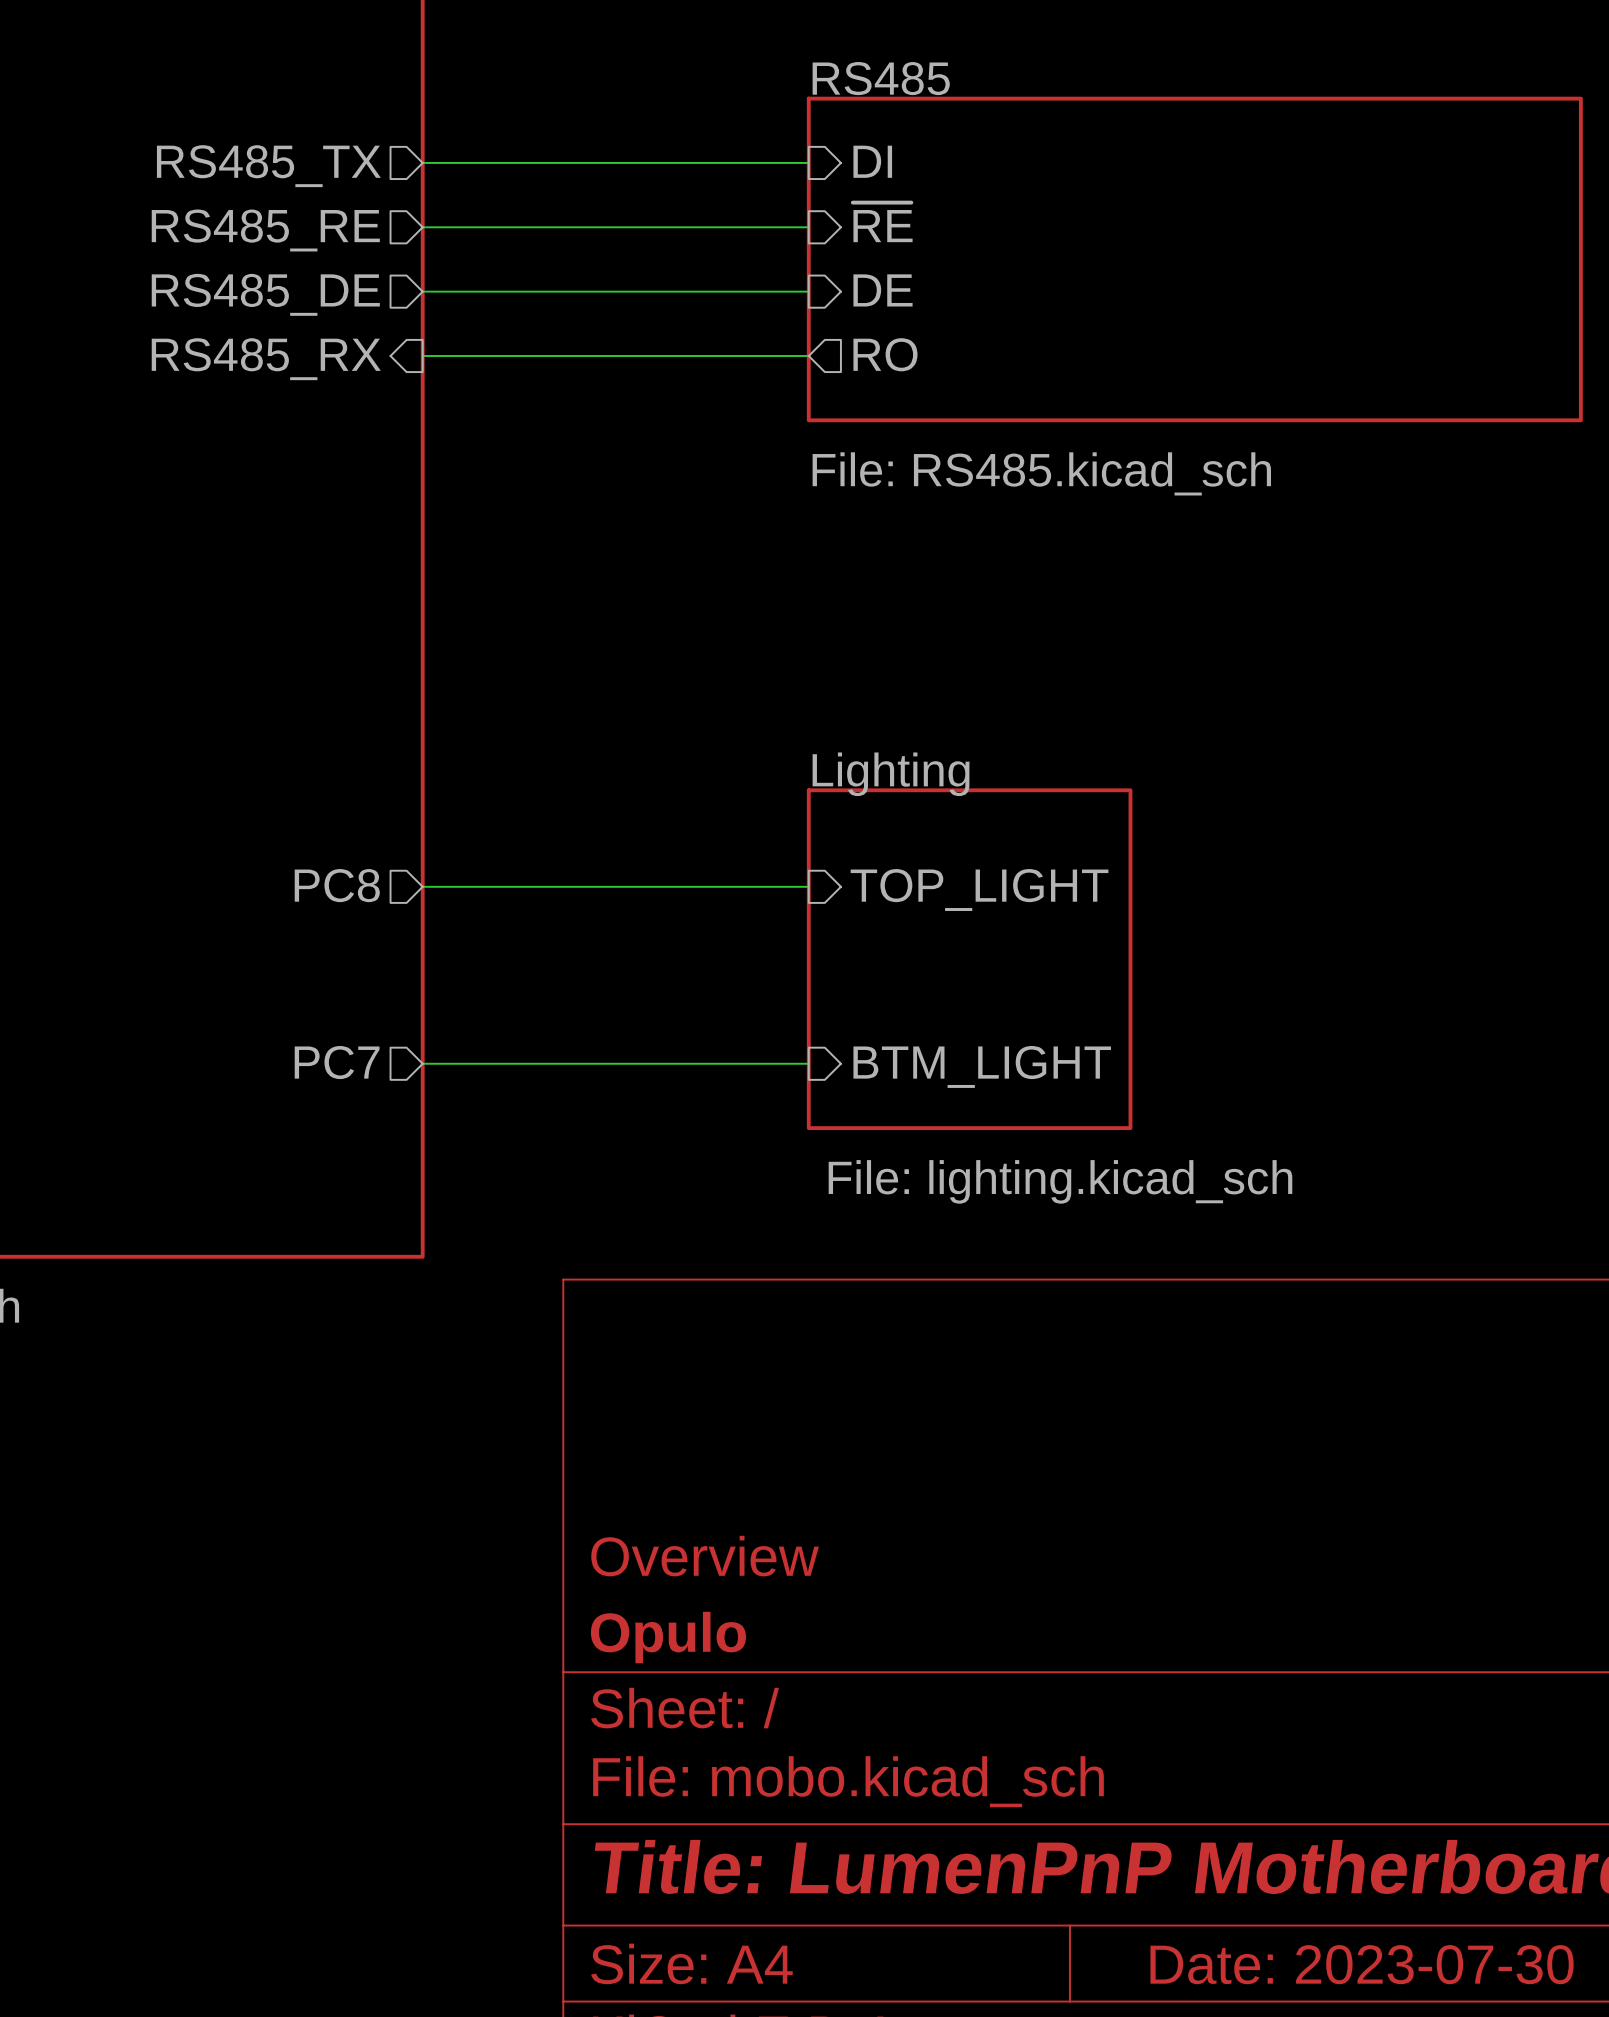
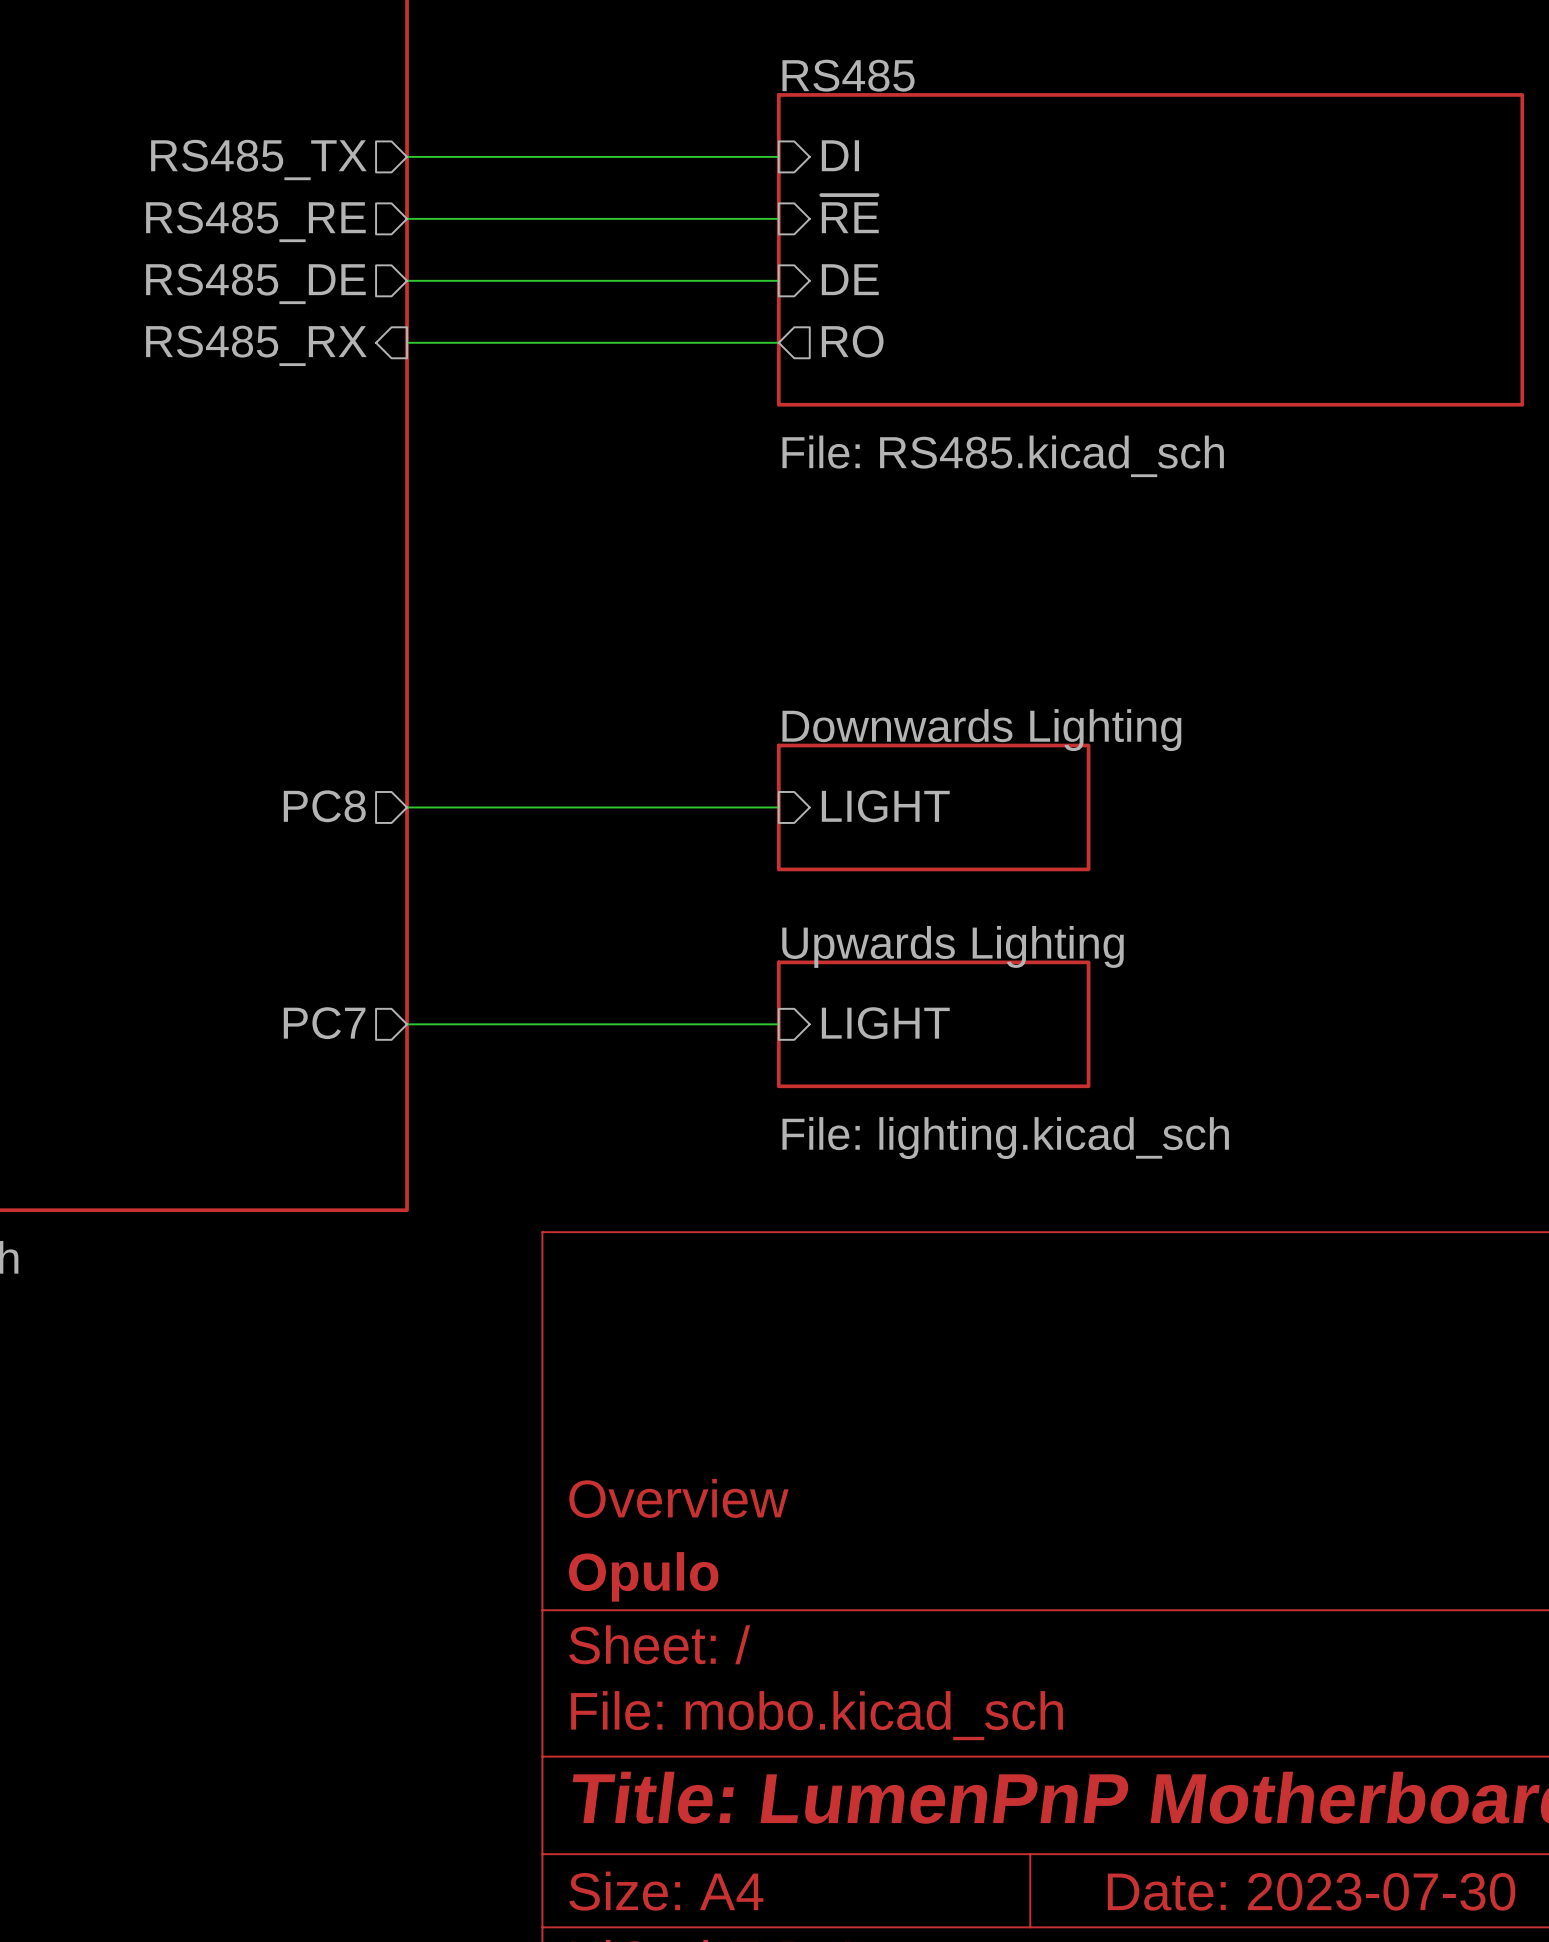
sheet pin: none -> LIGHT (885, 806)
sheet Downwards Lighting: none -> (933, 807)
sheet pin position: PC8 (337, 885) -> PC8 (324, 806)
wire: (422, 886) (808, 886) -> (407, 807) (778, 807)
hierarchical label: TOP_LIGHT (979, 890) -> none
sheet Lighting: File: lighting.kicad_sch (969, 959) -> none
sheet Upwards Lighting: none -> File: lighting.kicad_sch (933, 1024)
sheet pin: BTM_LIGHT (982, 1066) -> LIGHT (885, 1023)

